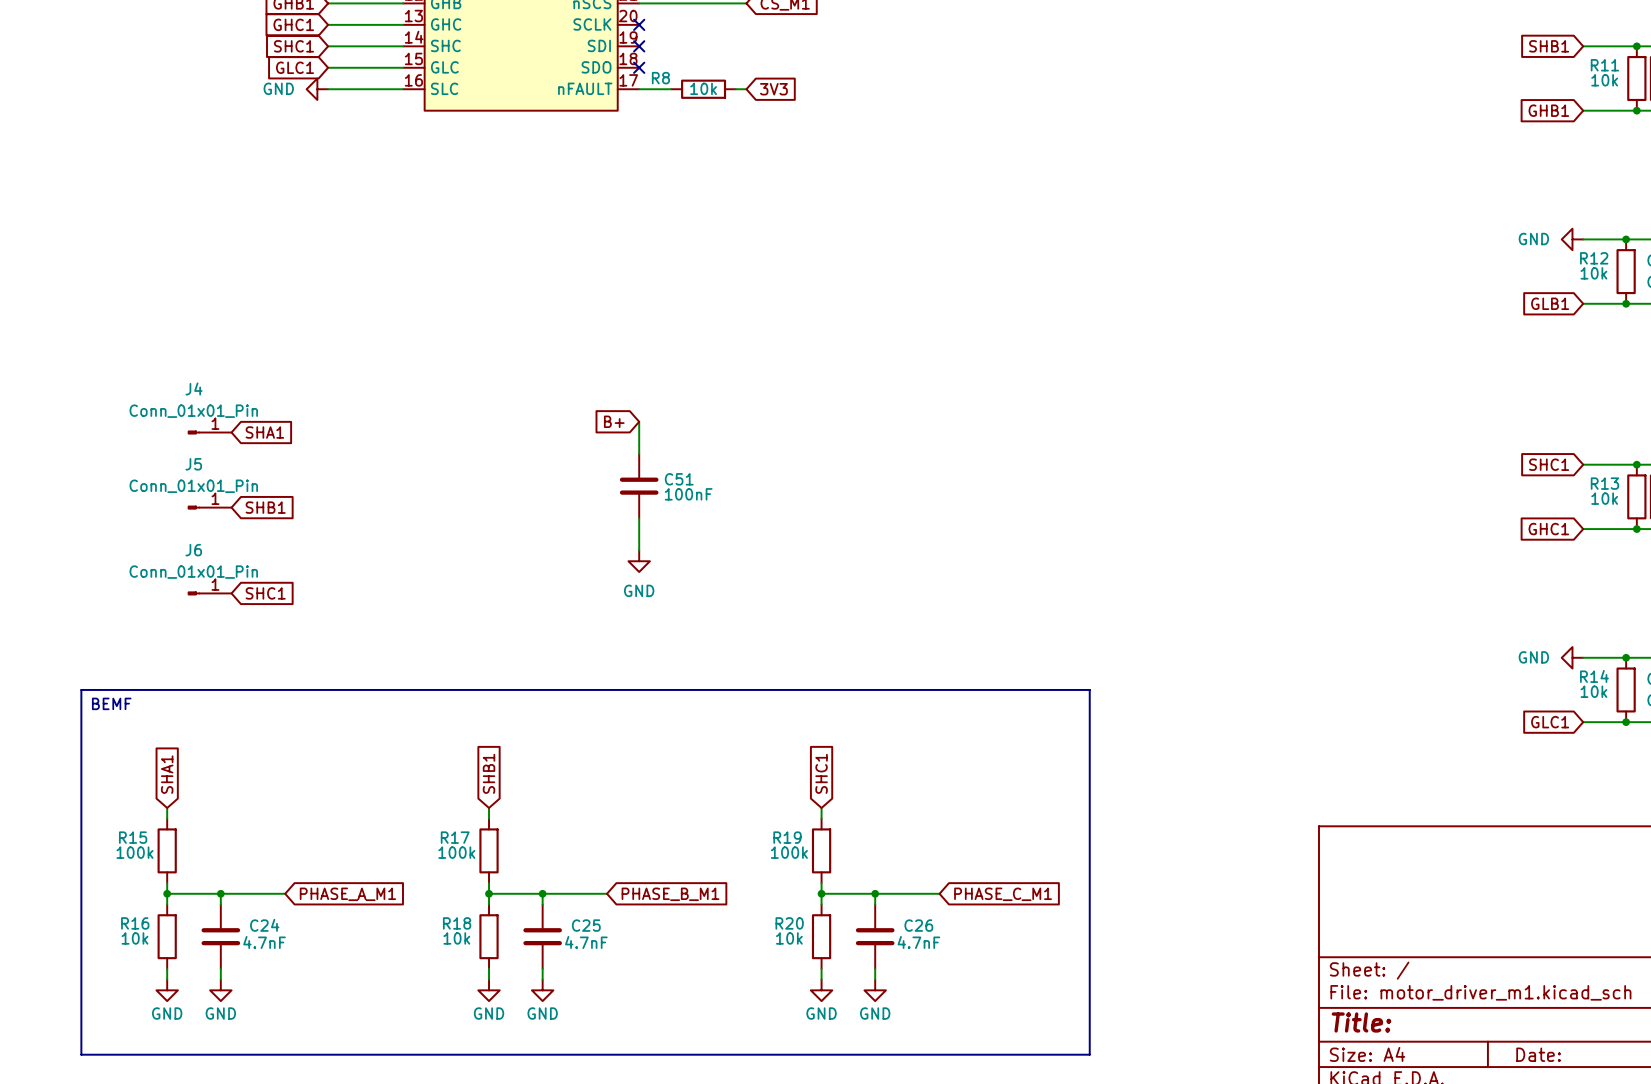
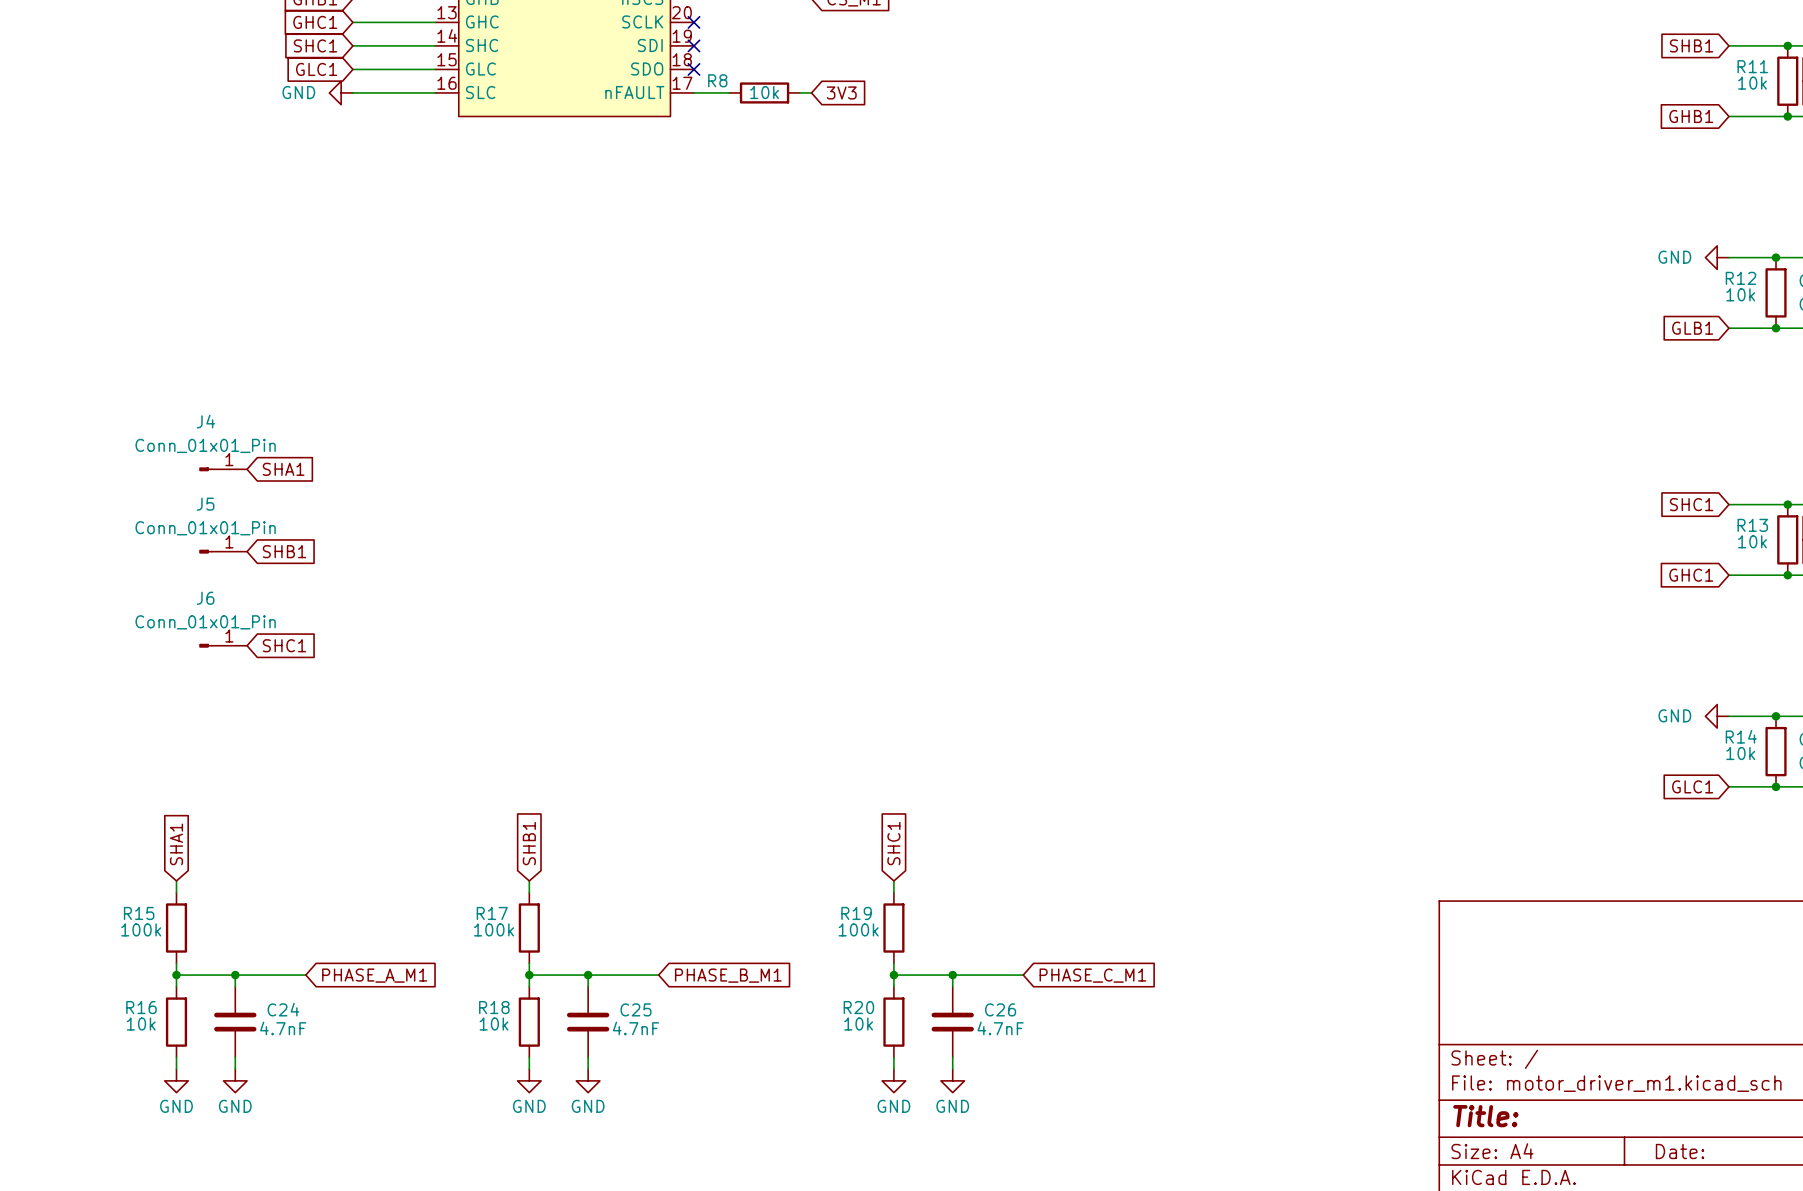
global label: B+ (614, 421) -> none
wire: (639, 421) (639, 453) -> none
C51: 100nF (639, 486) -> none
wire: (639, 518) (639, 550) -> none
power symbol: GND (639, 561) -> none
line: (81, 689) (1089, 689) (1089, 1054) (81, 1054) (81, 689) -> none
text: BEMF (111, 703) -> none

